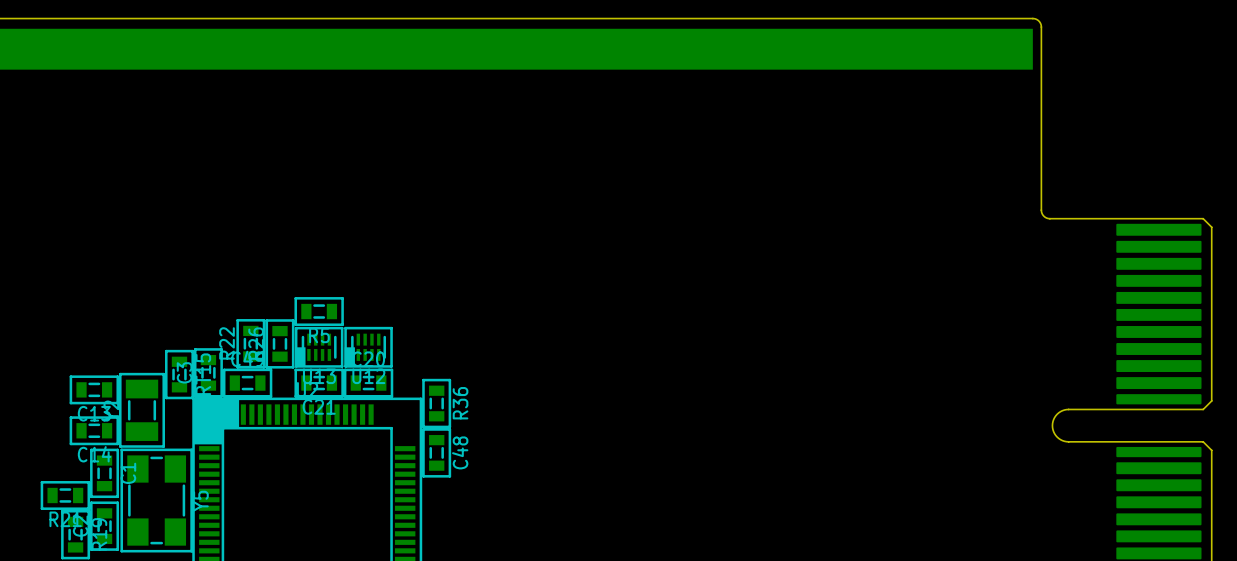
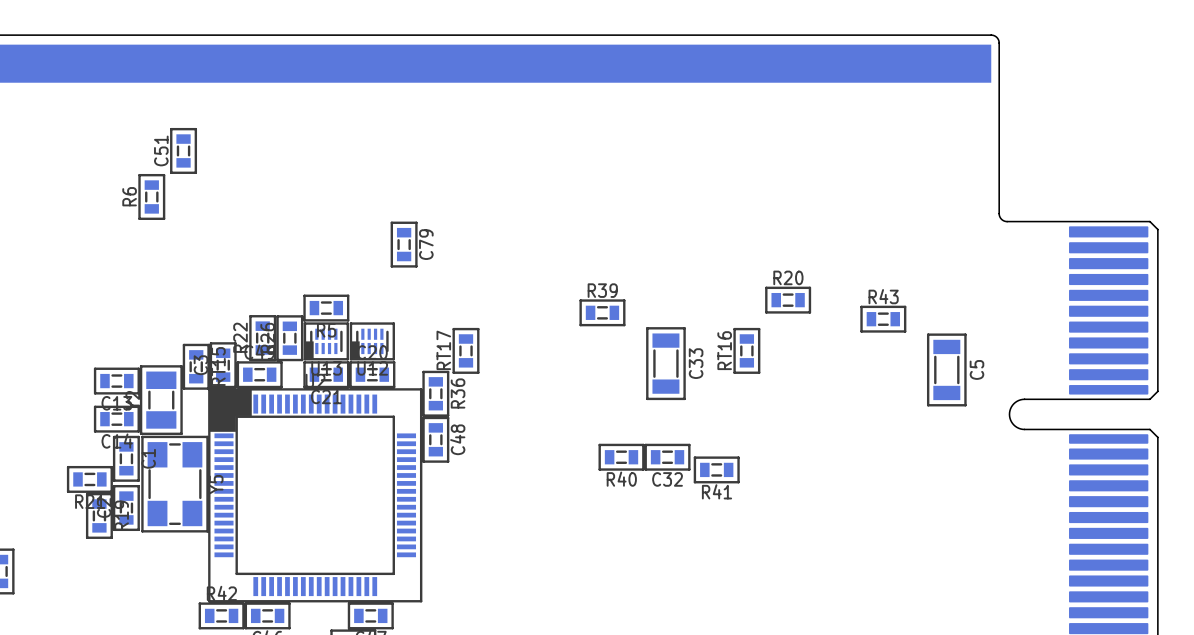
C51: none -> (183, 150)
R6: none -> (151, 196)
C79: none -> (404, 244)
R20: none -> (788, 300)
R39: none -> (602, 312)
R43: none -> (883, 319)
RT17: none -> (466, 350)
RT16: none -> (746, 350)
C33: none -> (665, 363)
C5: none -> (946, 369)
R40: none -> (621, 457)
C32: none -> (667, 457)
R41: none -> (716, 469)

